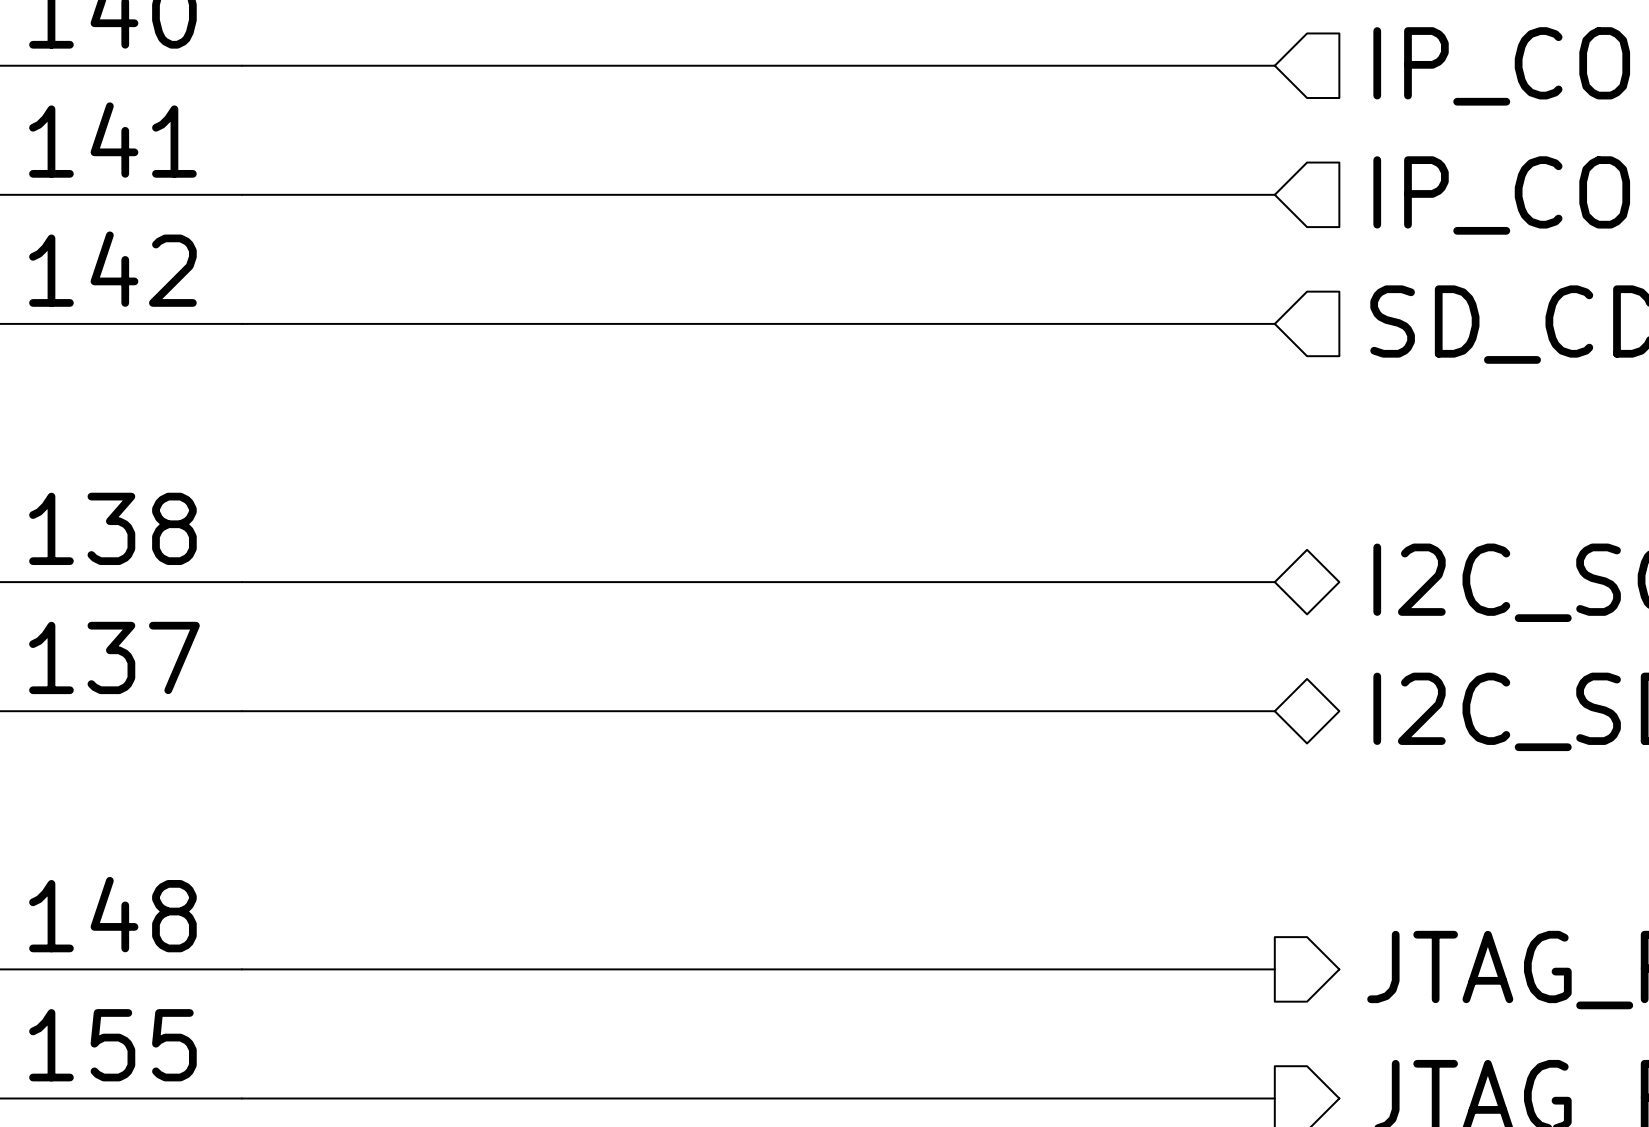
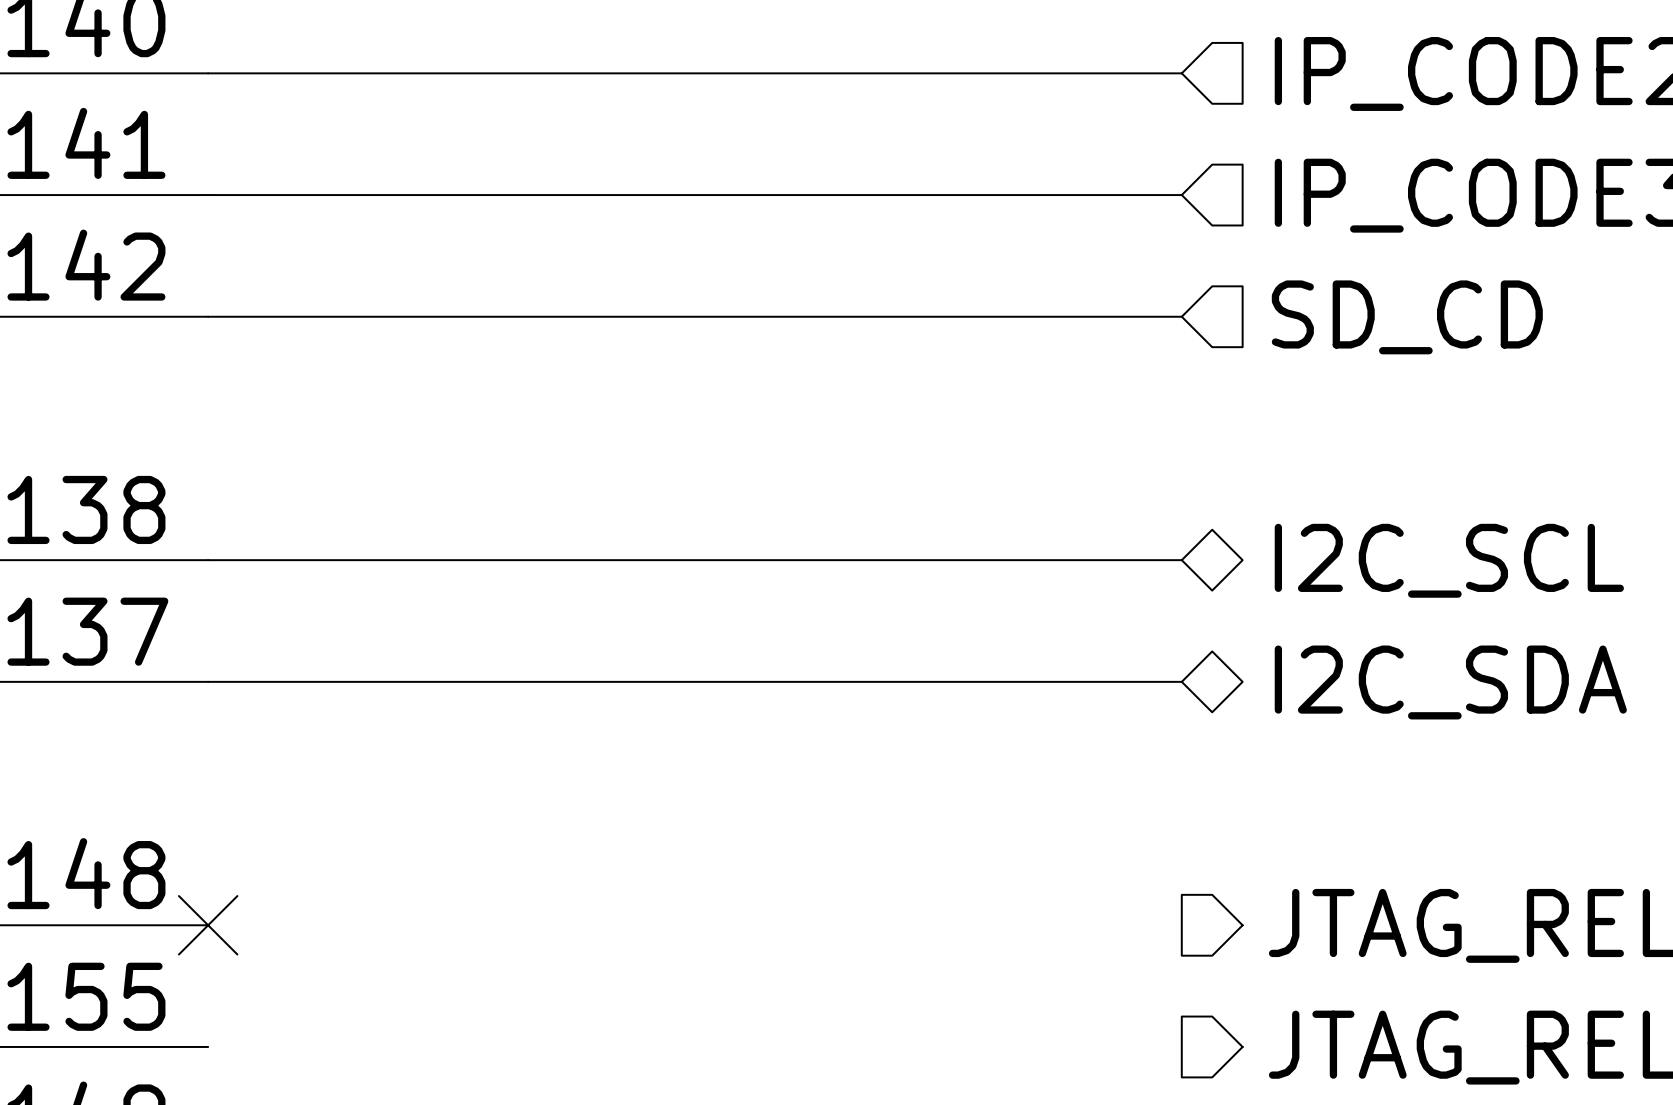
wire: (242, 969) (1274, 969) -> none
no-connect mark: none -> (208, 925)
wire: (242, 1098) (1274, 1098) -> none

